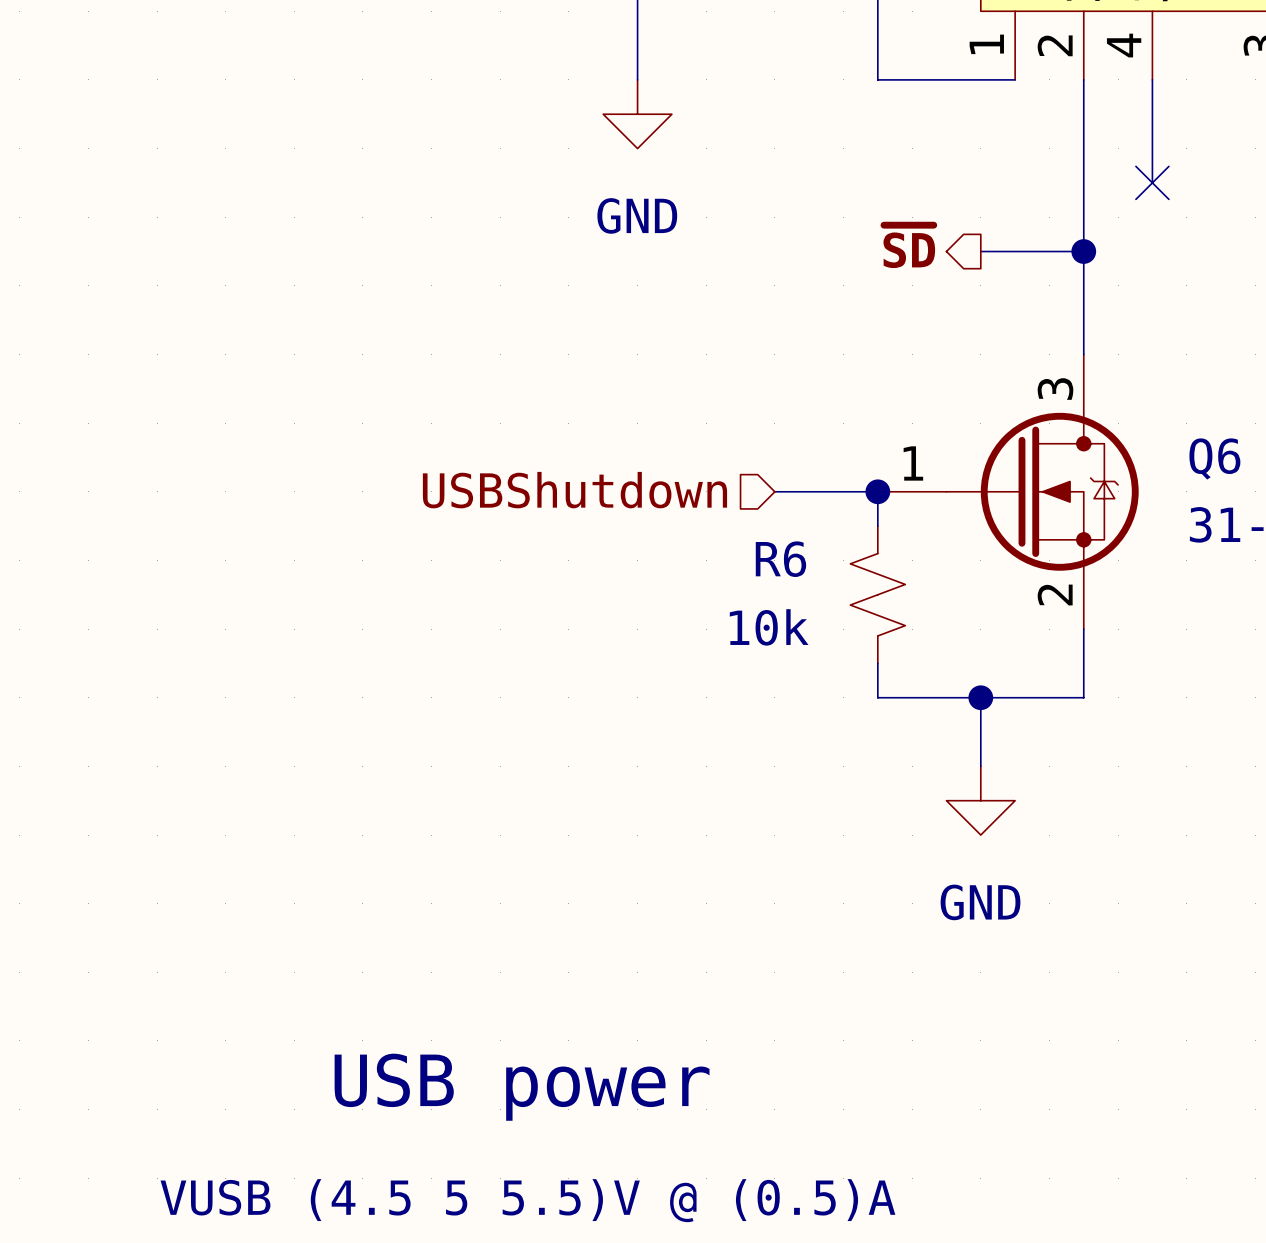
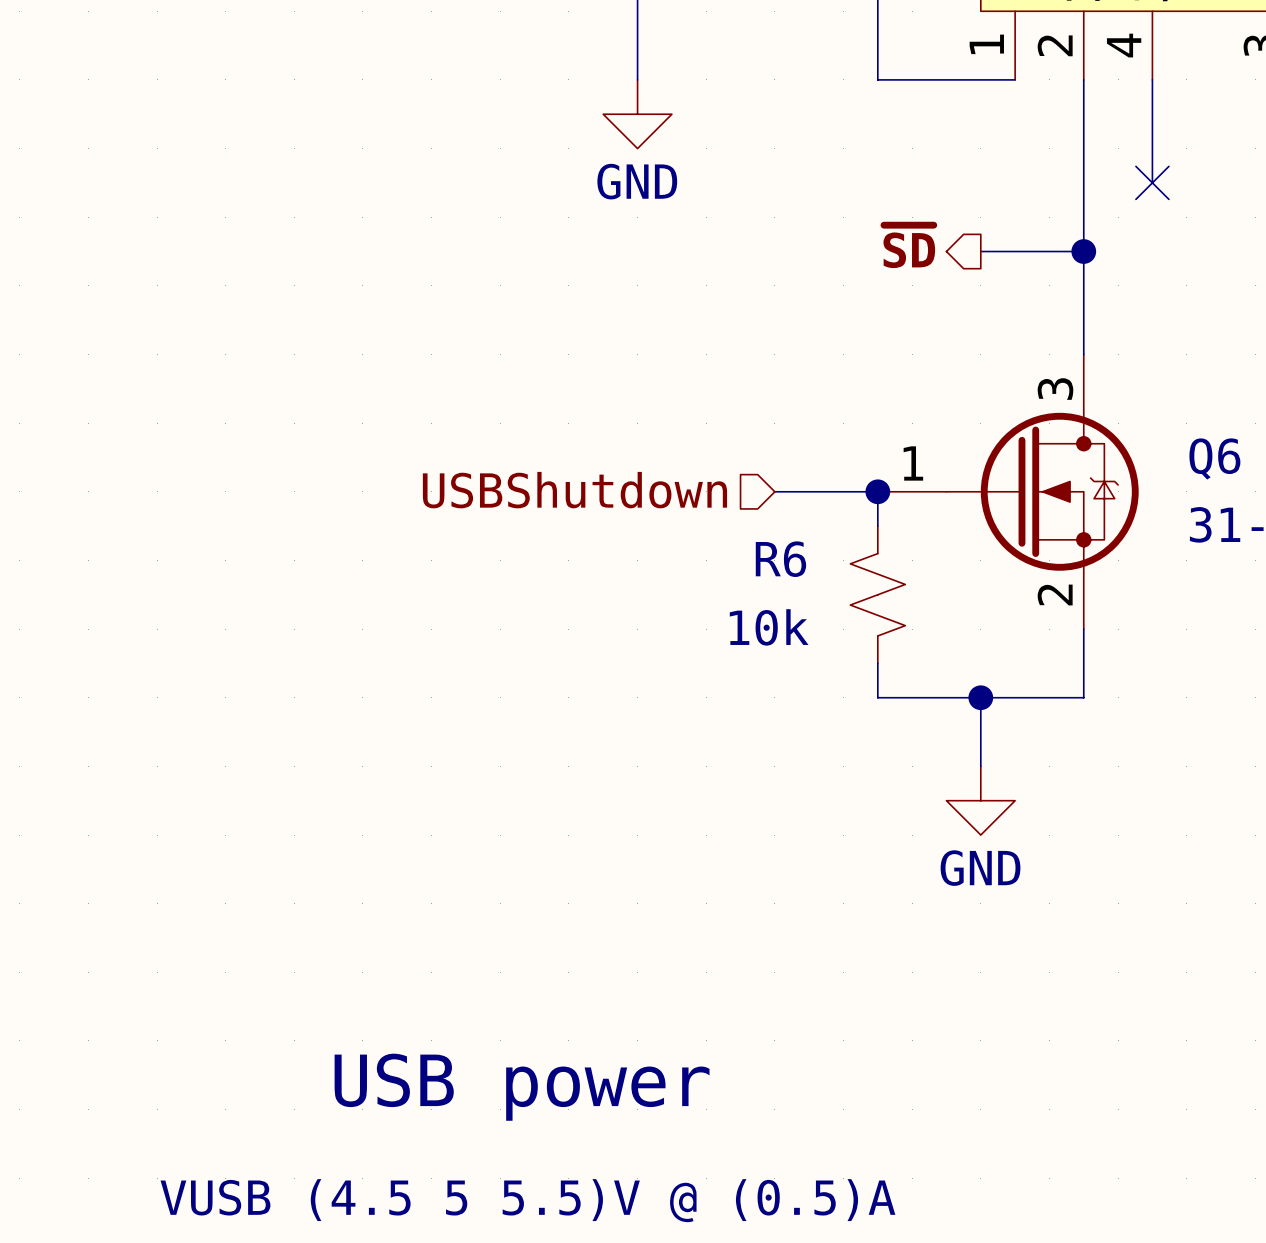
power symbol text position: GND (637, 215) -> GND (637, 181)
power symbol text position: GND (980, 902) -> GND (980, 868)

